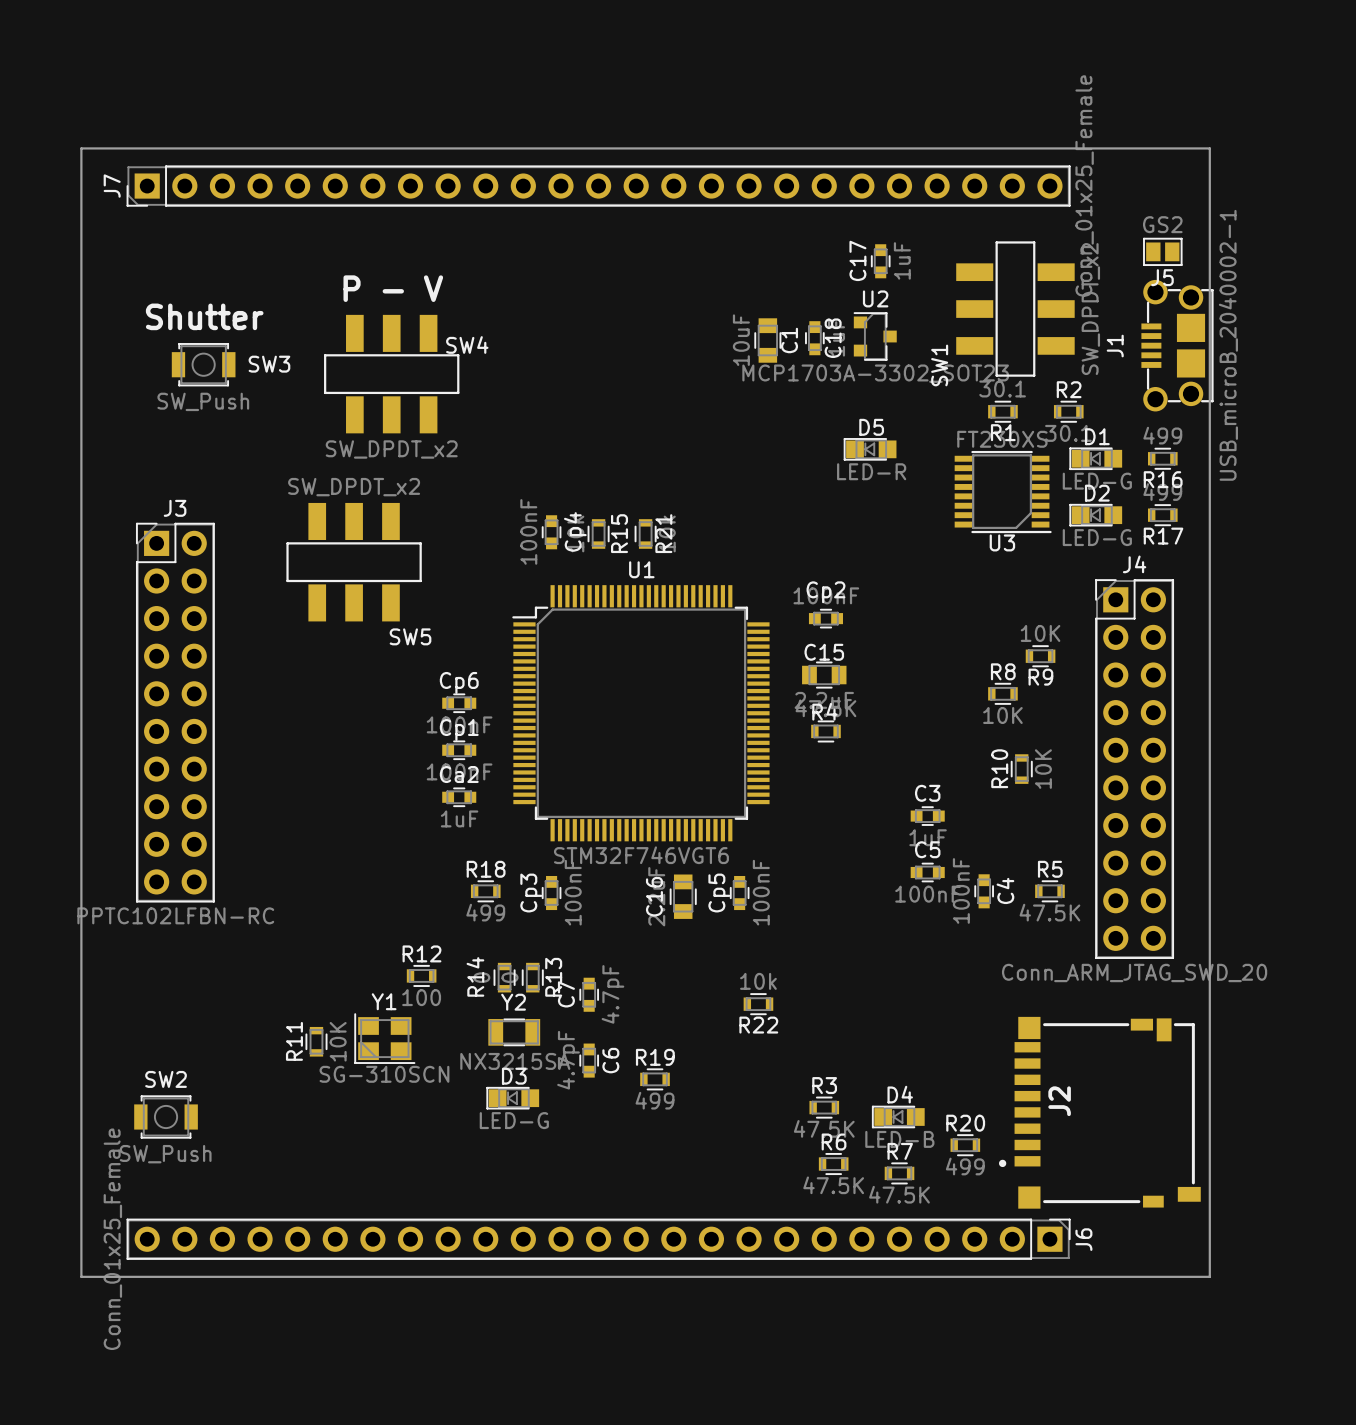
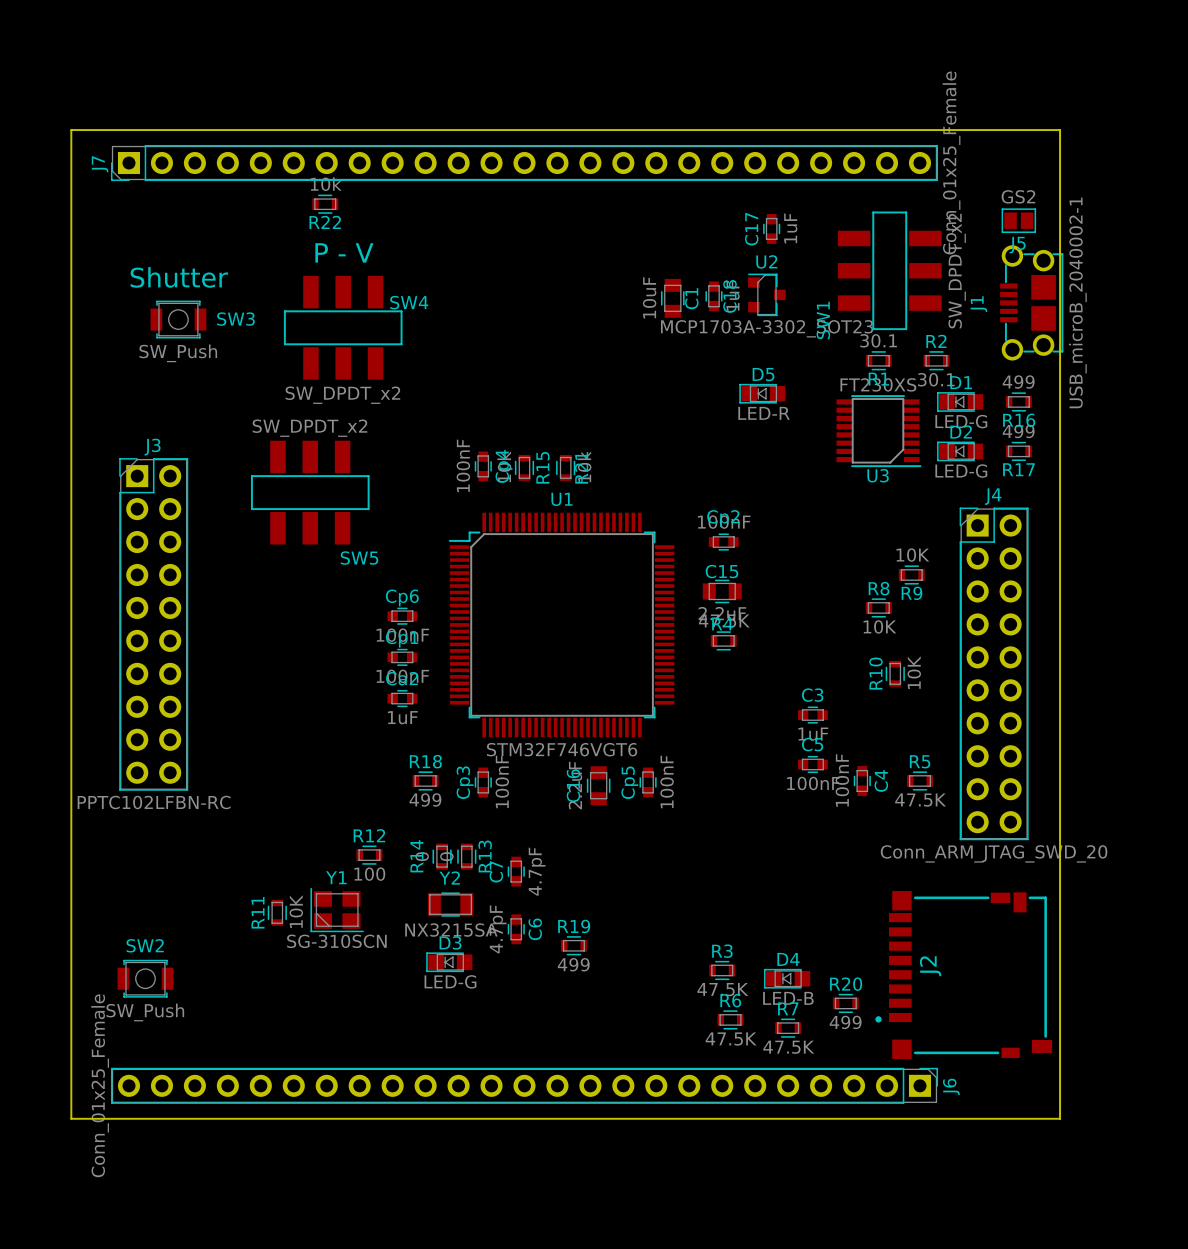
R22 position: (758, 1004) -> (325, 204)

